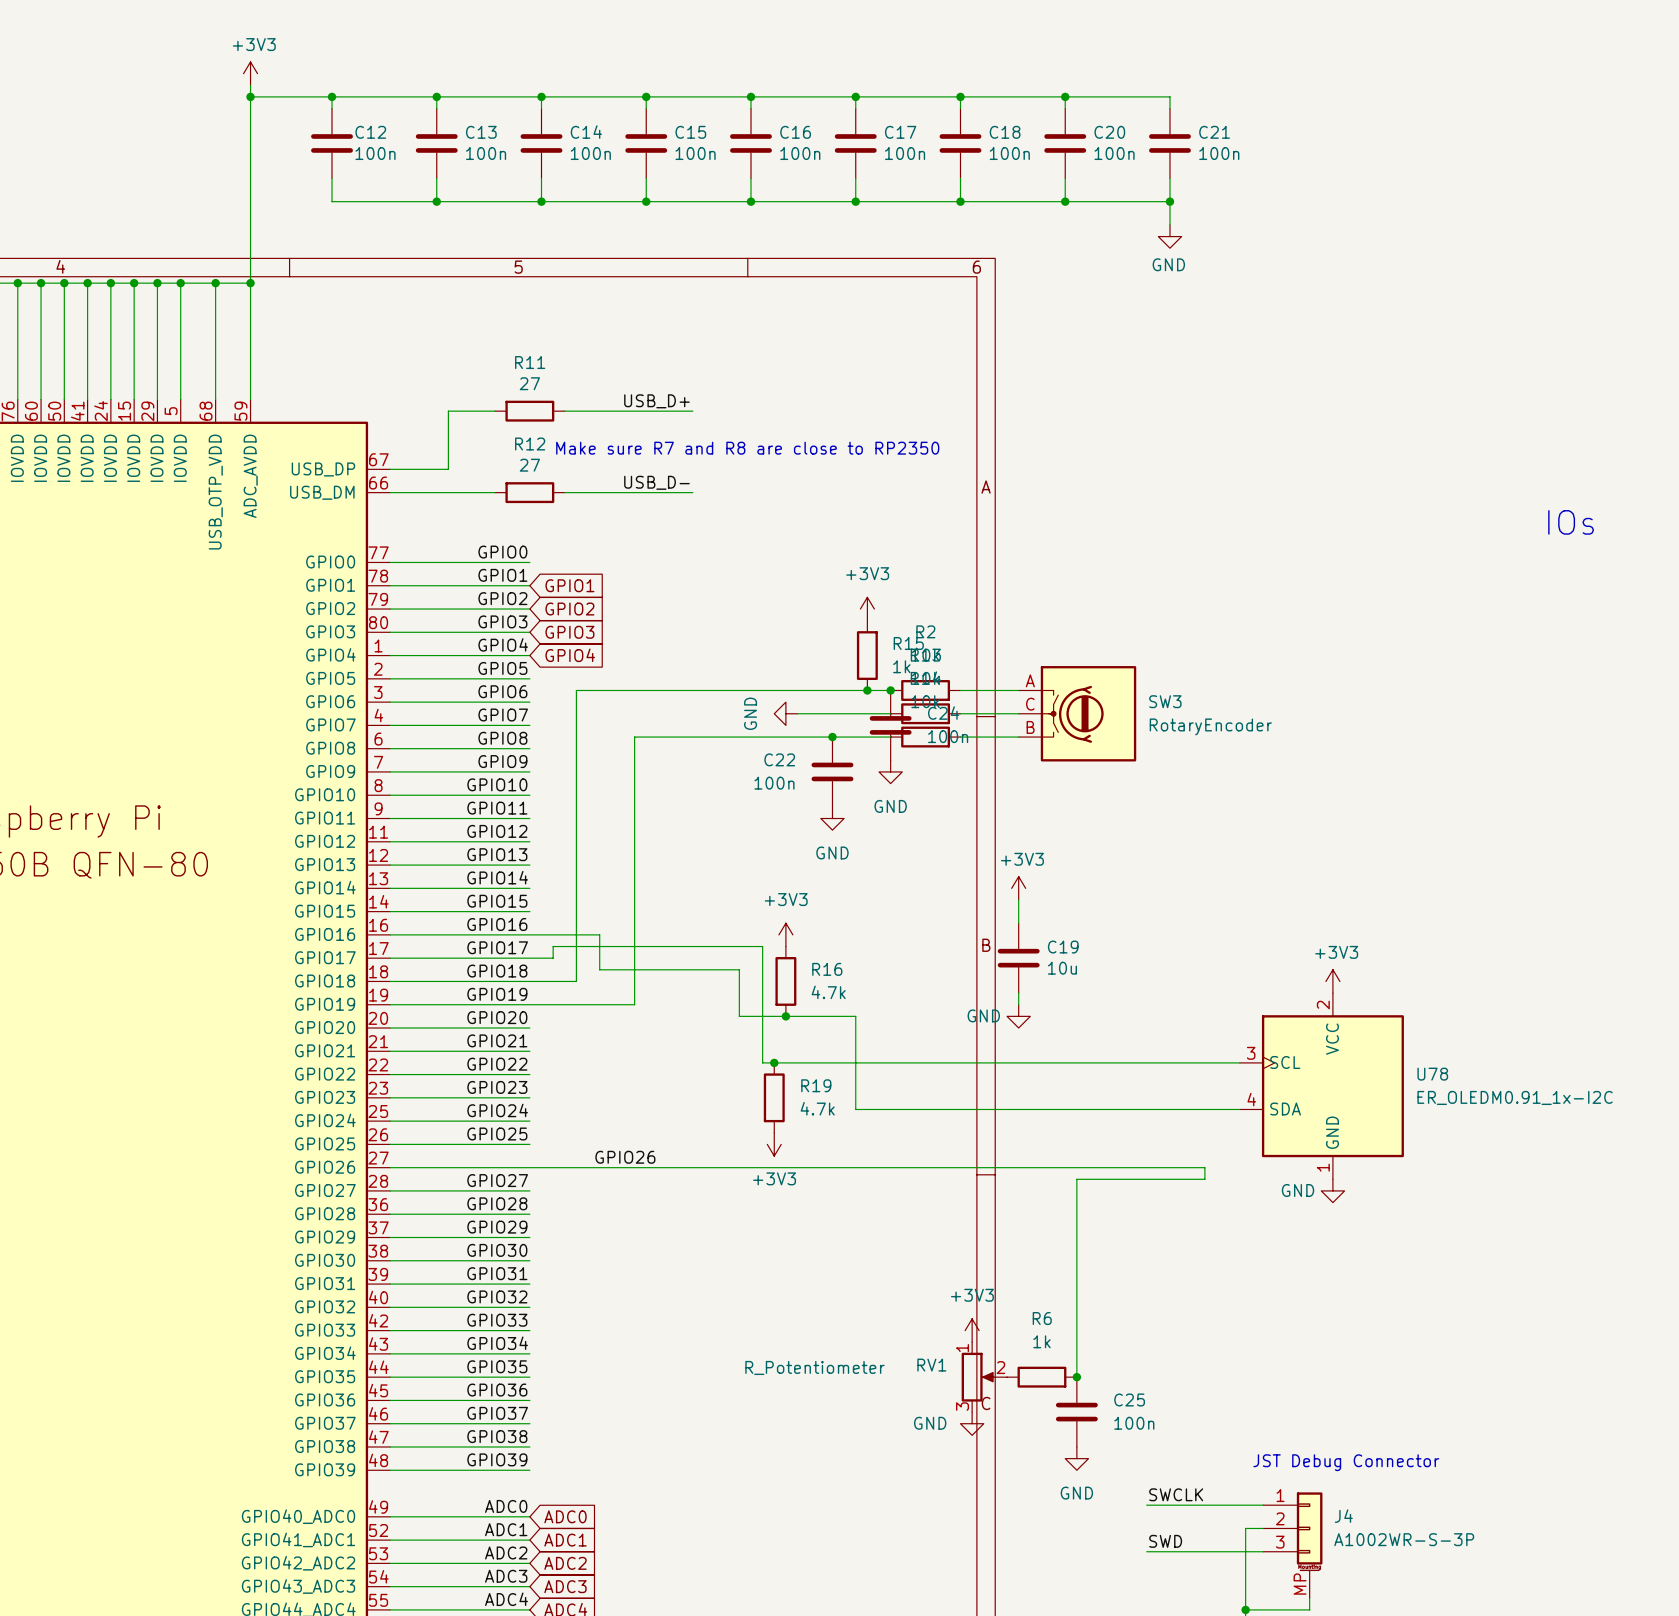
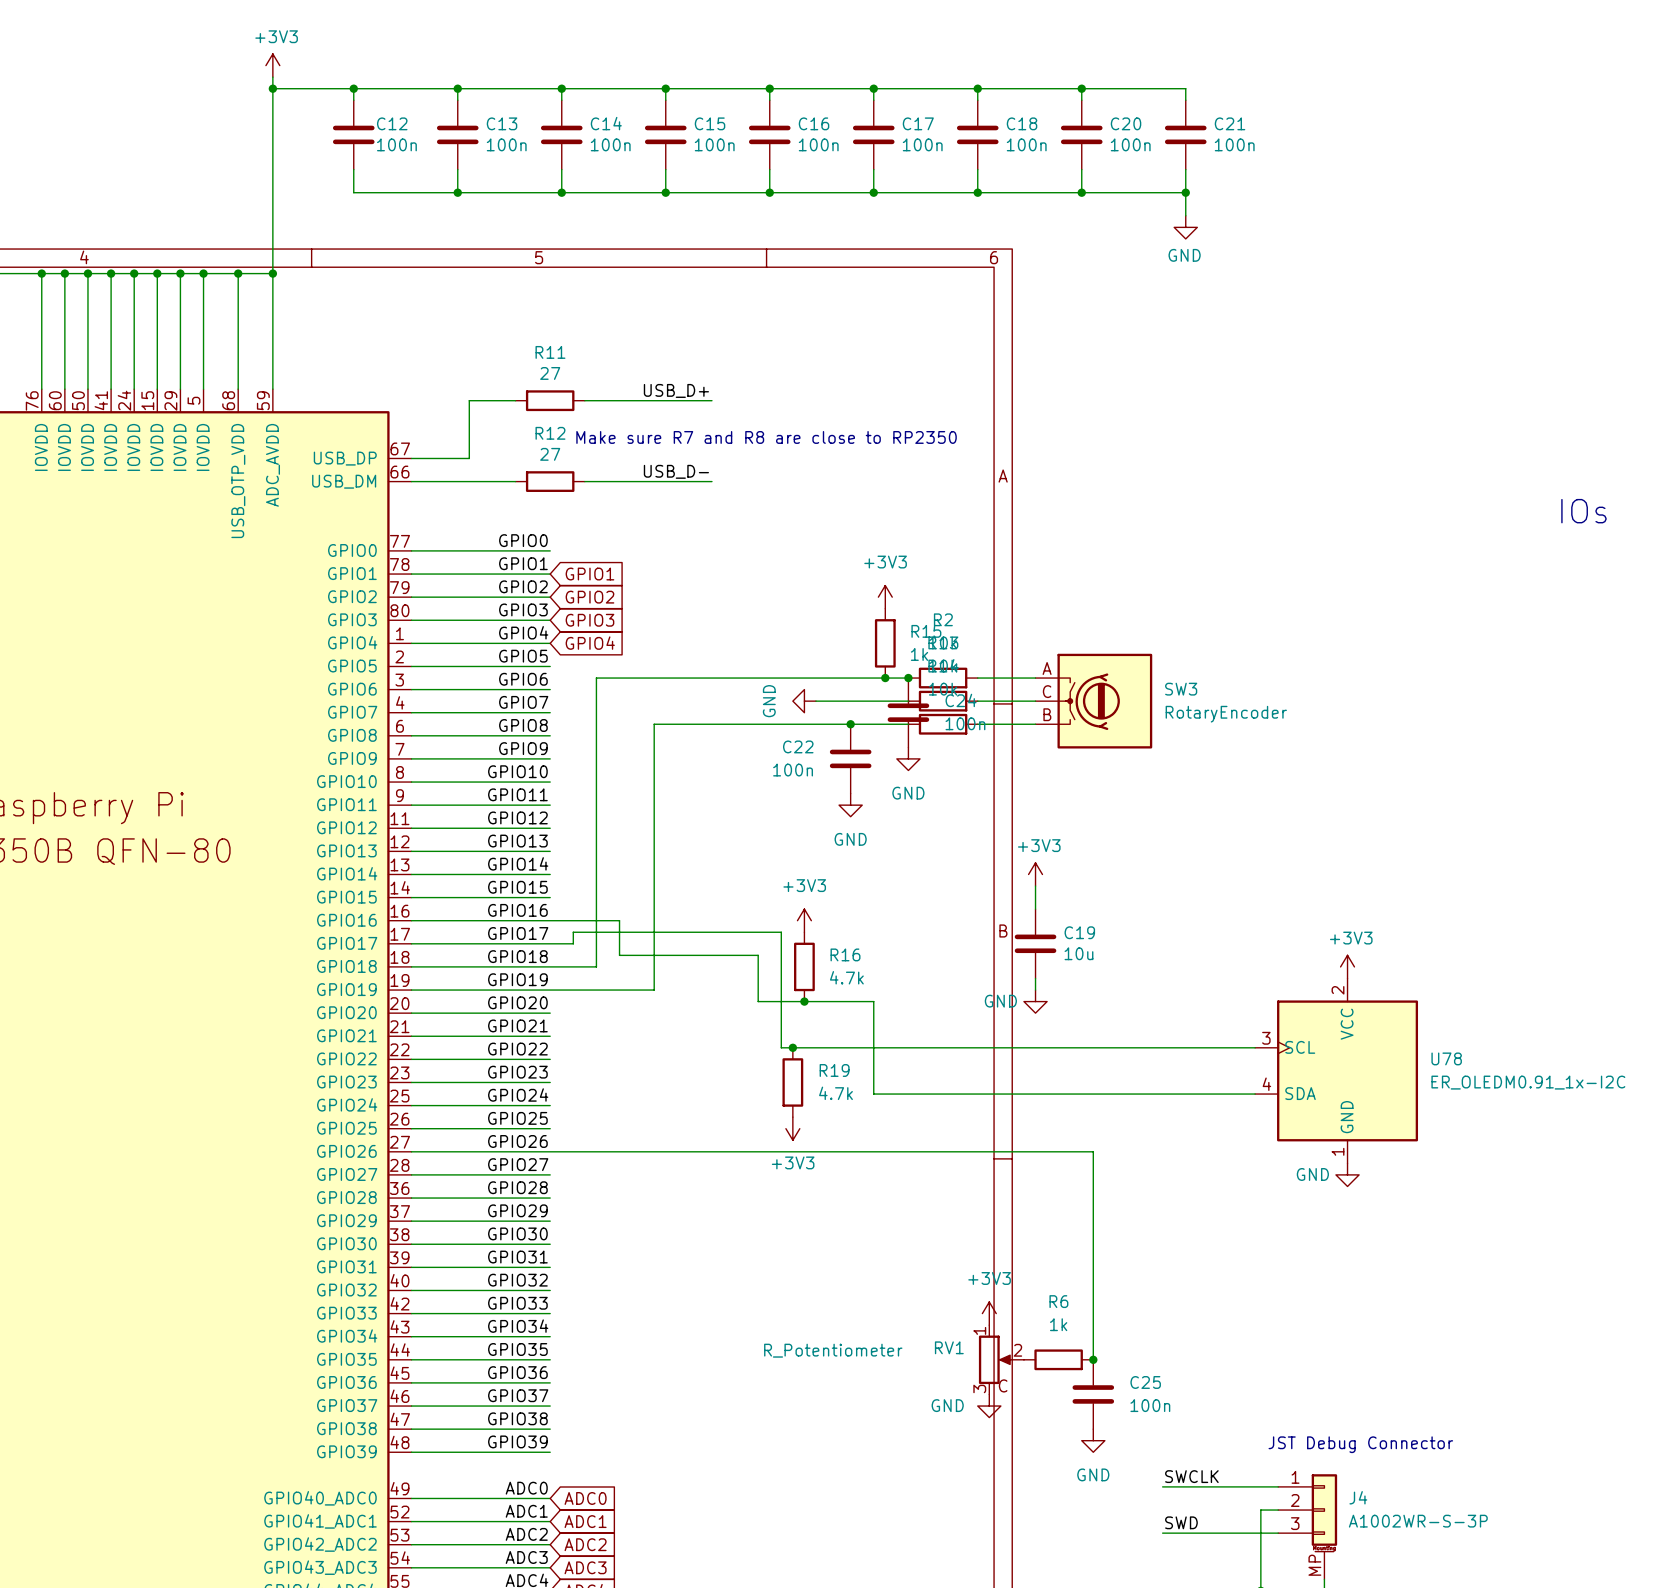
label position: GPIO26 (625, 1157) -> GPIO26 (517, 1141)
wire: (1076, 1167) (1204, 1167) (1204, 1179) (1076, 1179) -> (1093, 1151) (1093, 1163)

